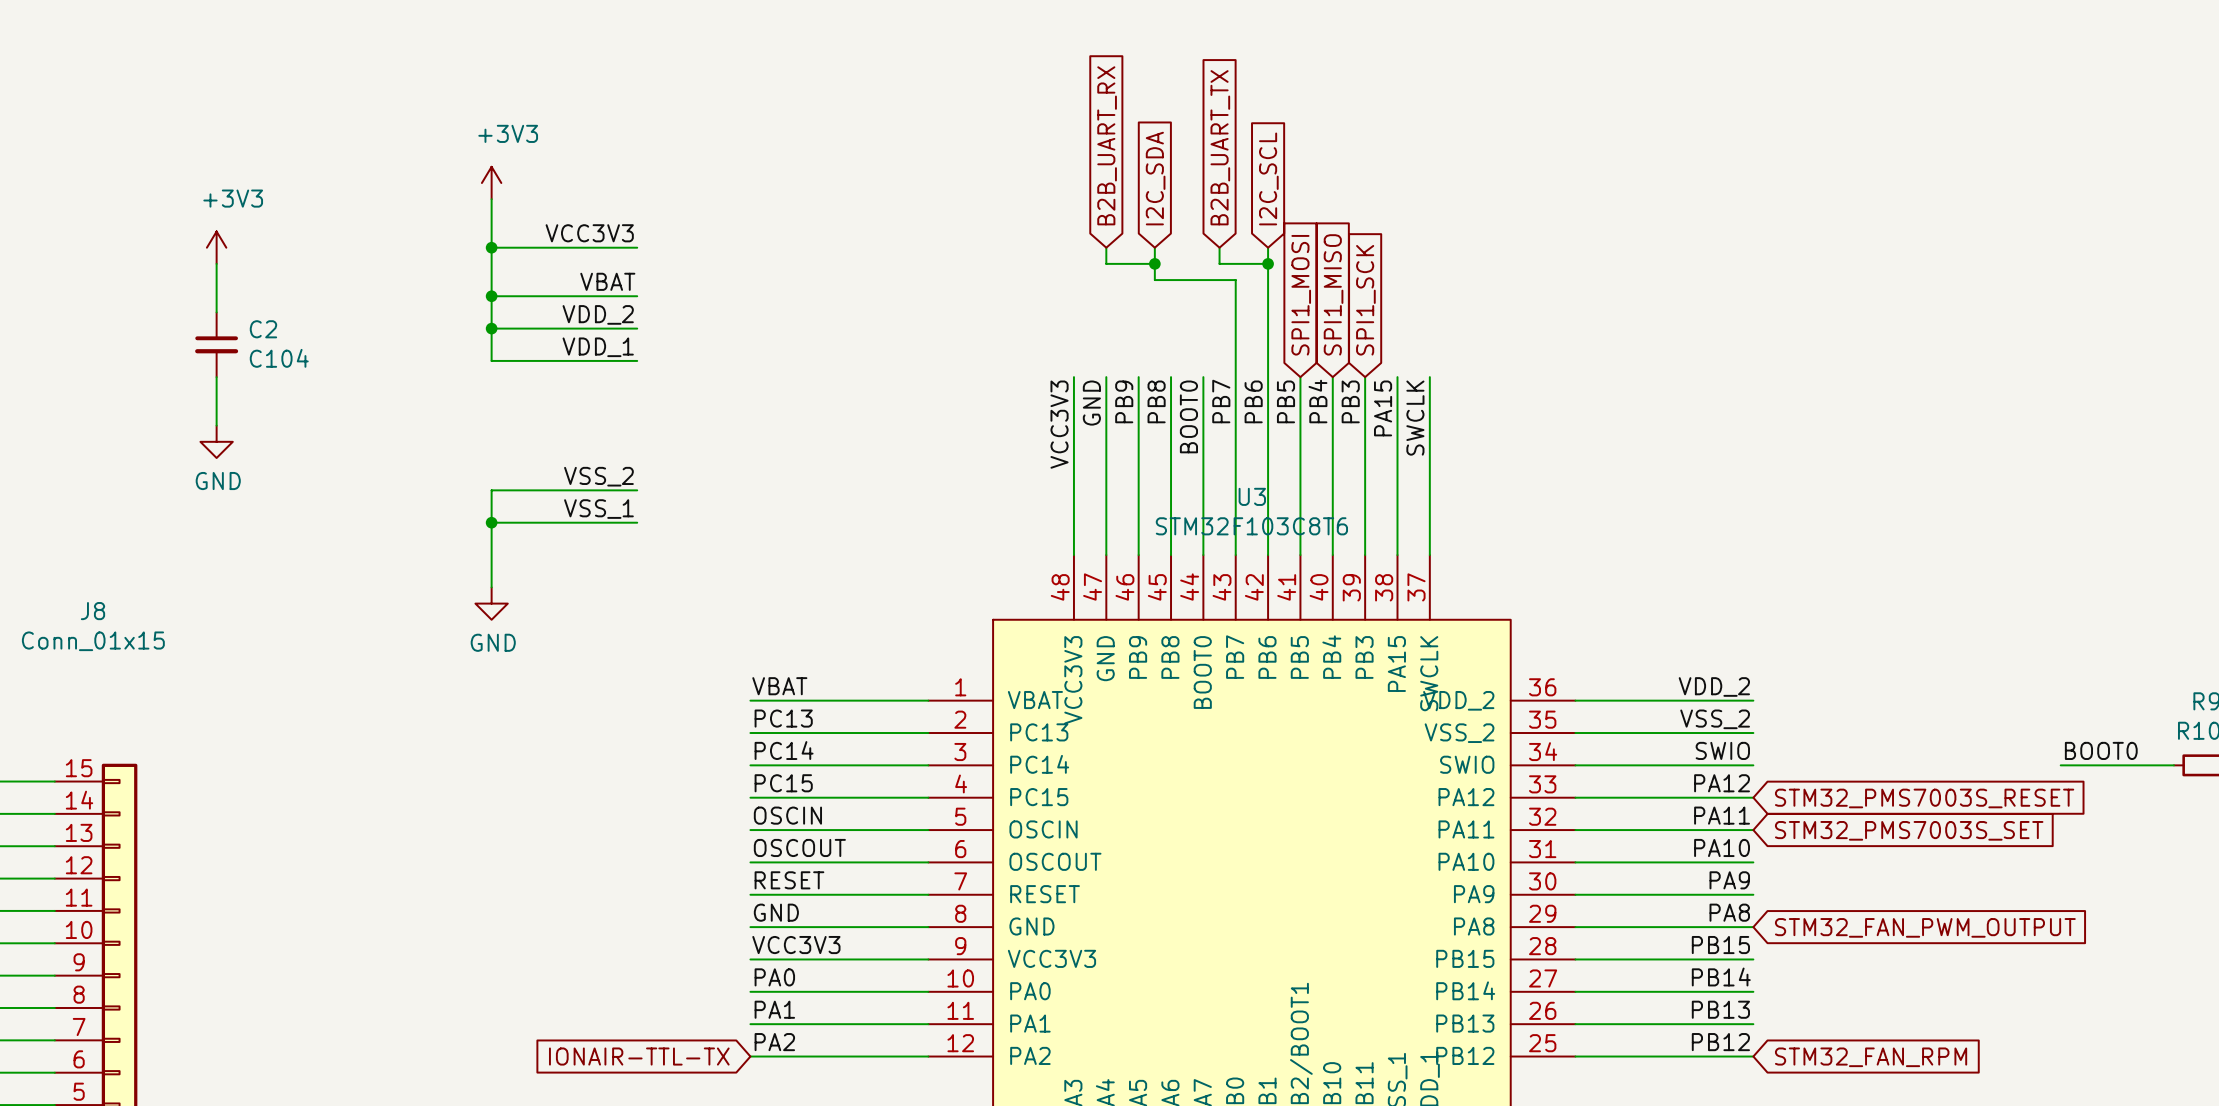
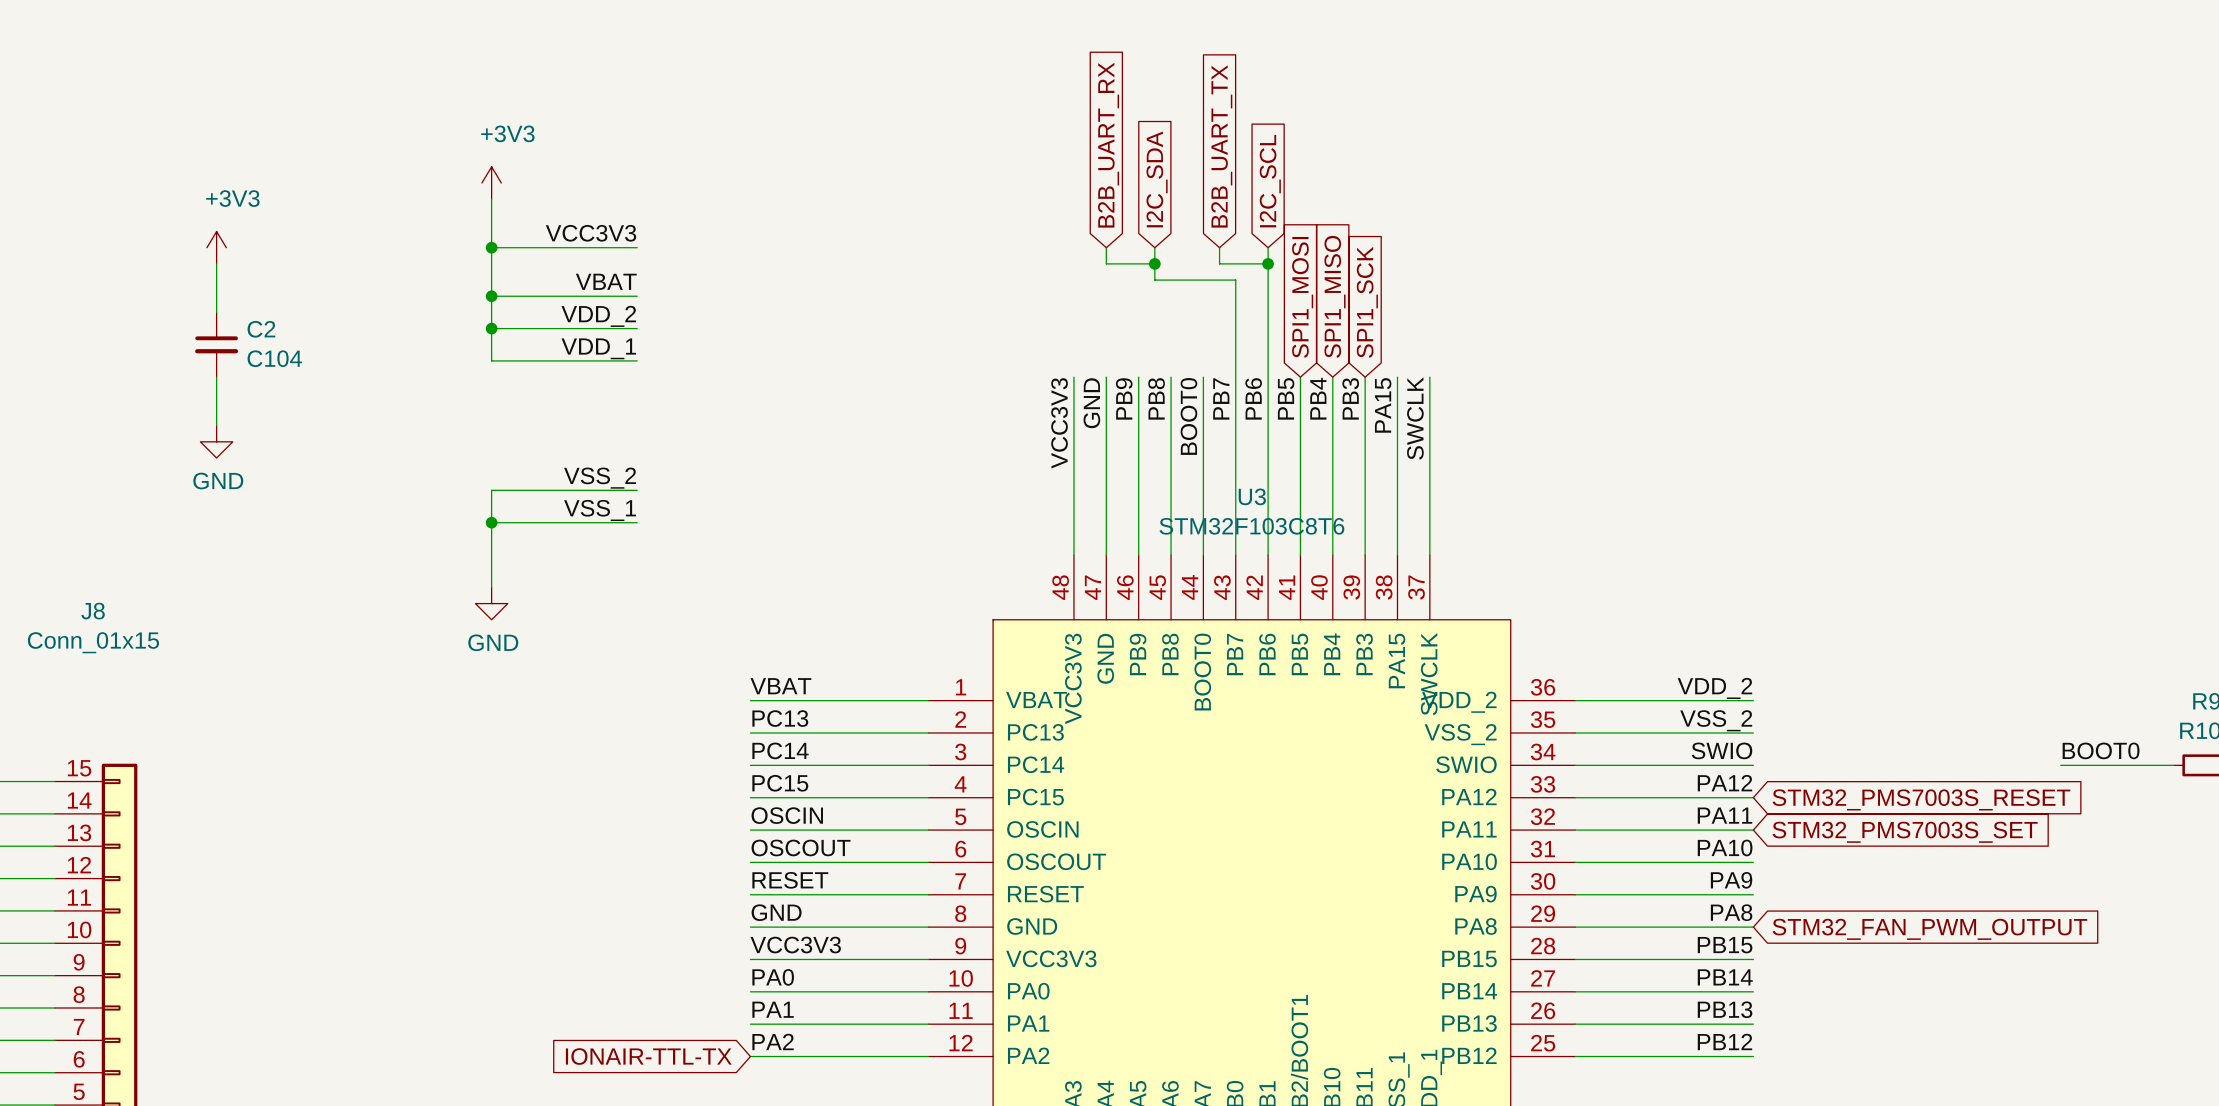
global label: STM32_FAN_RPM (1871, 1057) -> none

